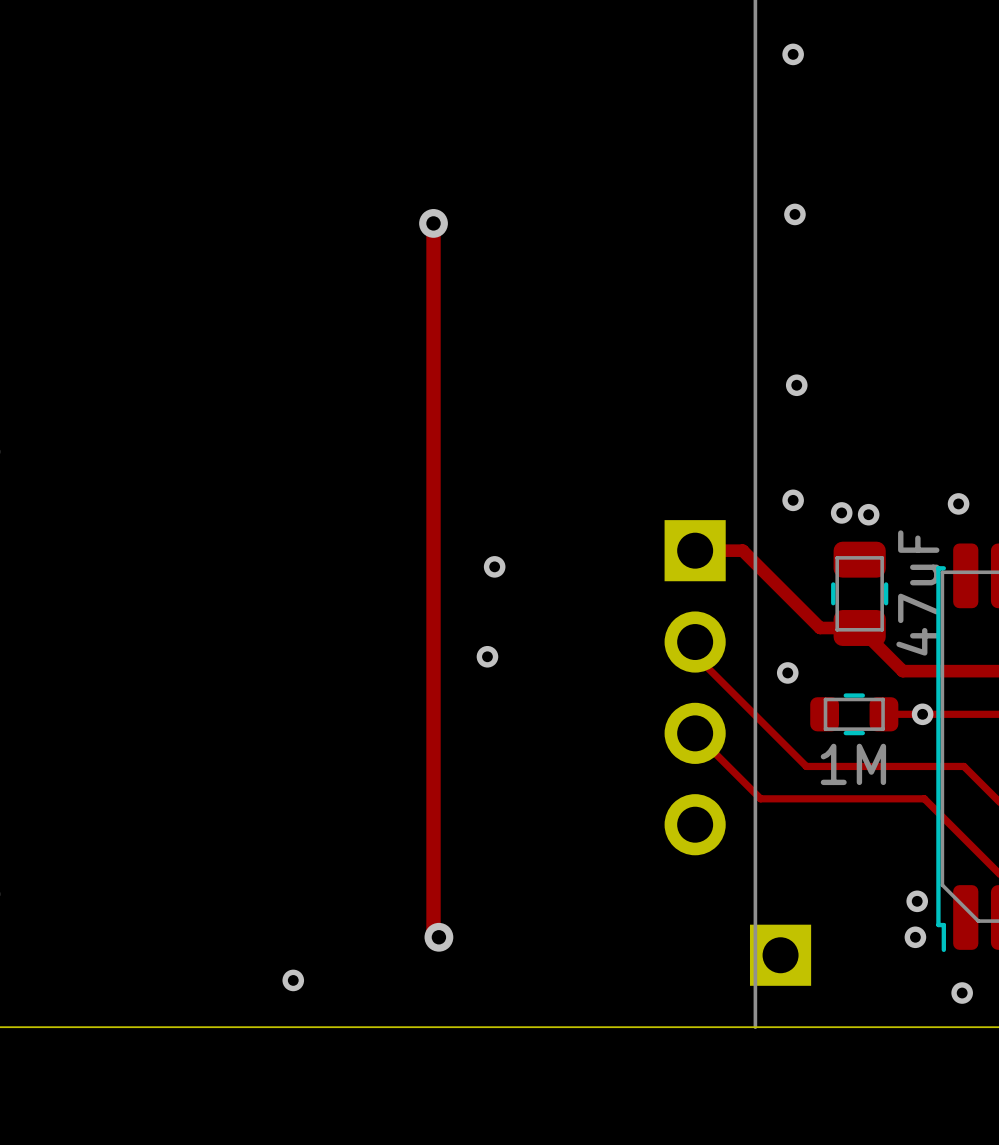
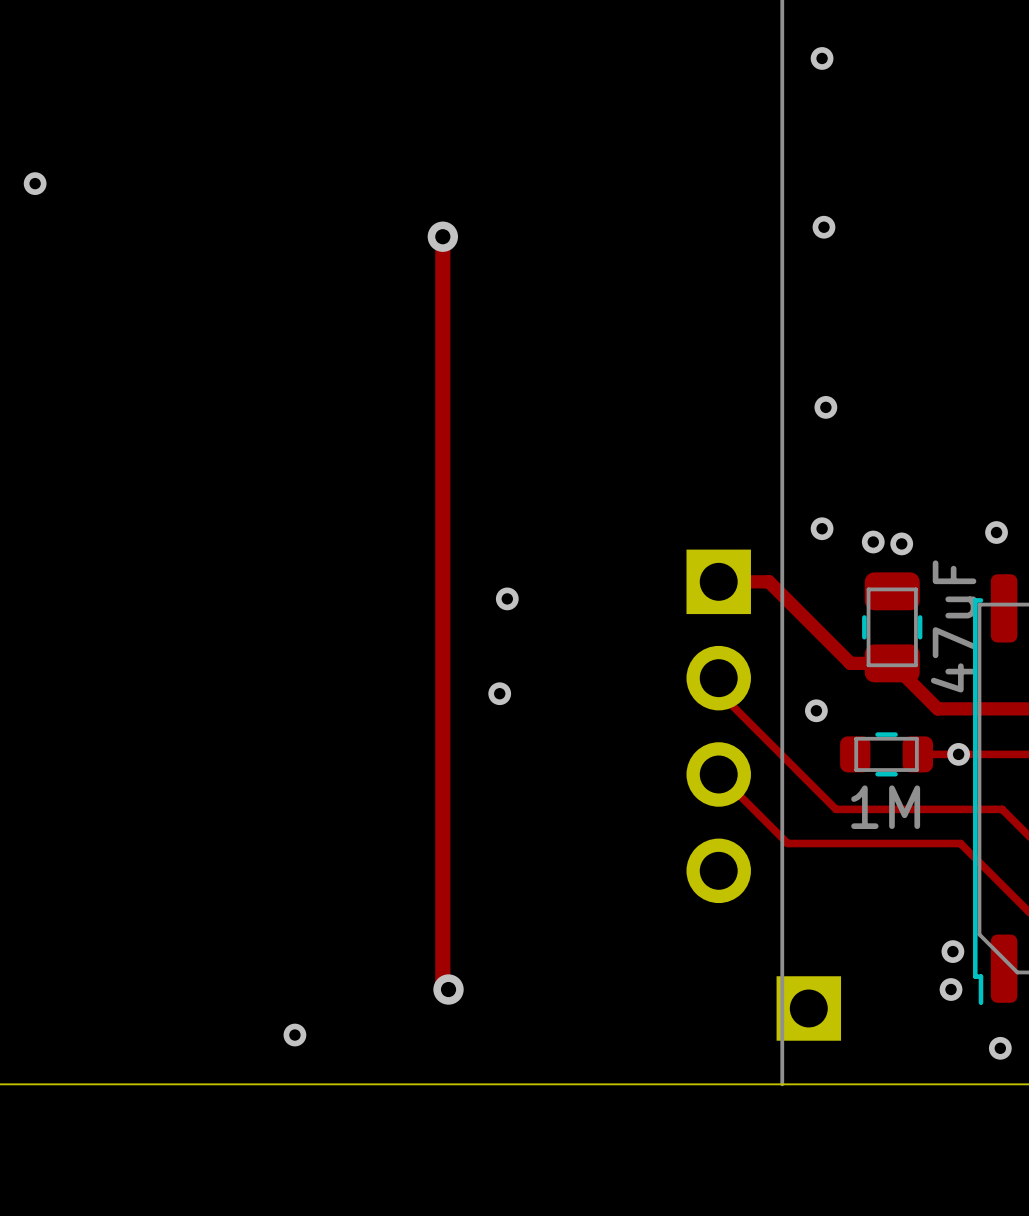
via: none -> (35, 183)

